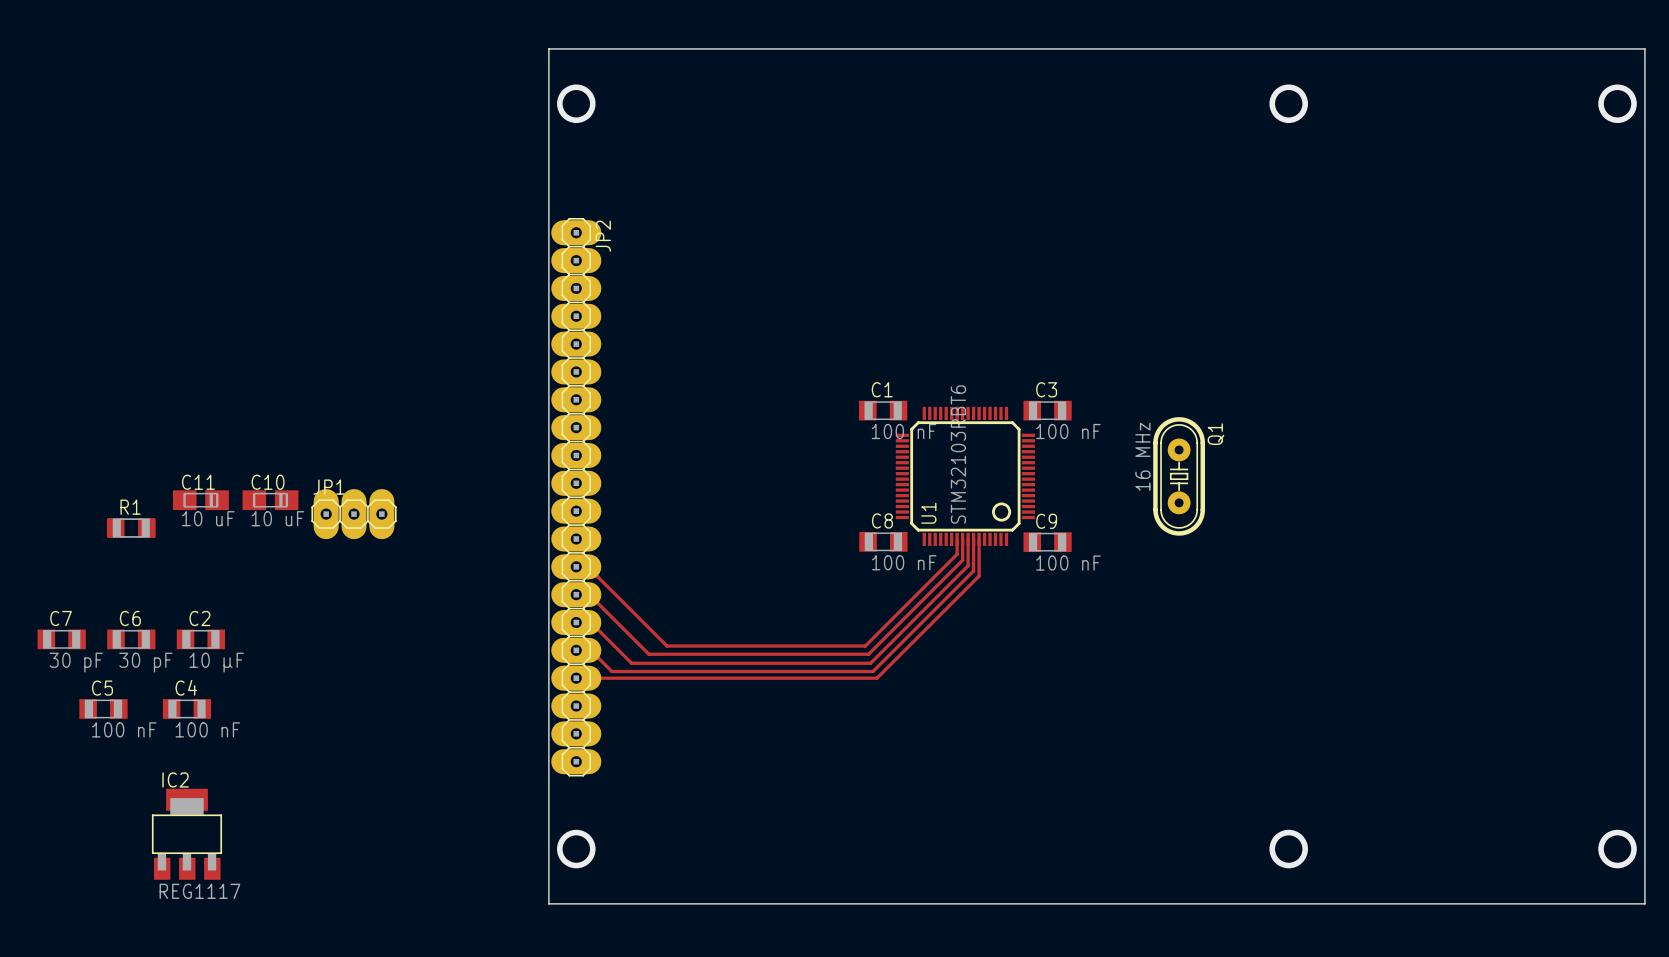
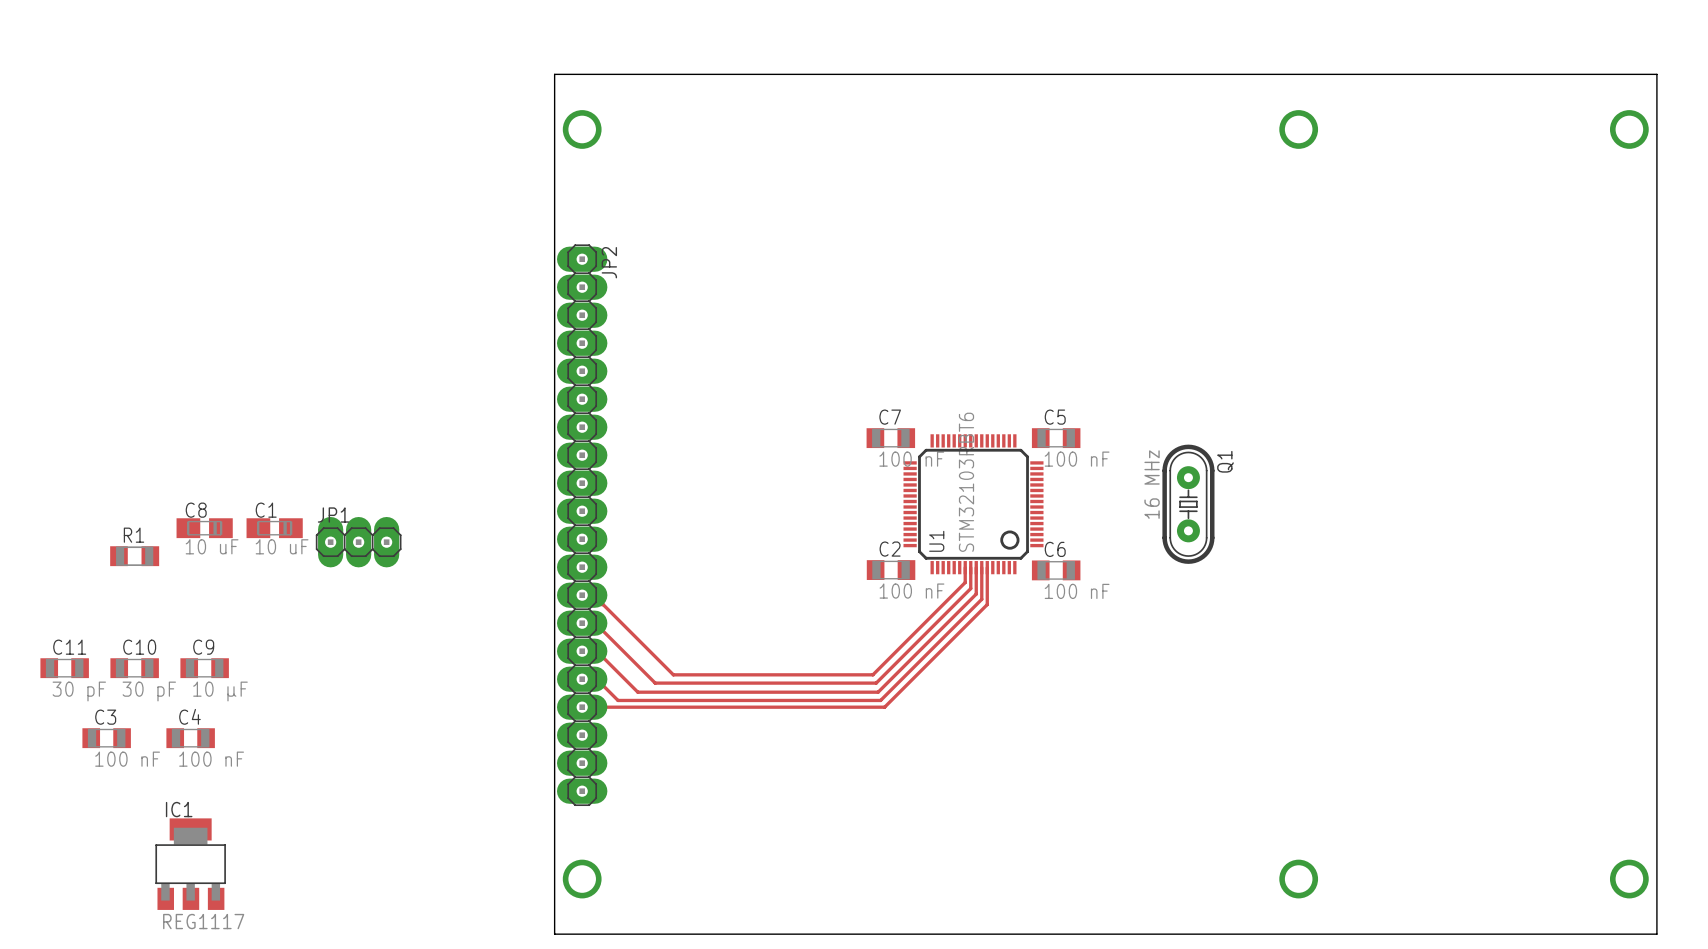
C1 name: C1 (882, 389) -> C7 (890, 417)
C3 name: C3 (1046, 389) -> C5 (1055, 417)
C11 name: C11 (198, 482) -> C8 (196, 510)
C10 name: C10 (268, 482) -> C1 (266, 510)
C8 name: C8 (882, 520) -> C2 (890, 549)
C9 name: C9 (1046, 521) -> C6 (1055, 549)
C7 name: C7 (61, 618) -> C11 (69, 647)
C6 name: C6 (130, 618) -> C10 (139, 647)
C2 name: C2 (199, 618) -> C9 (203, 647)
C5 name: C5 (102, 688) -> C3 (105, 717)
IC2 name: IC2 (175, 779) -> IC1 (179, 809)

